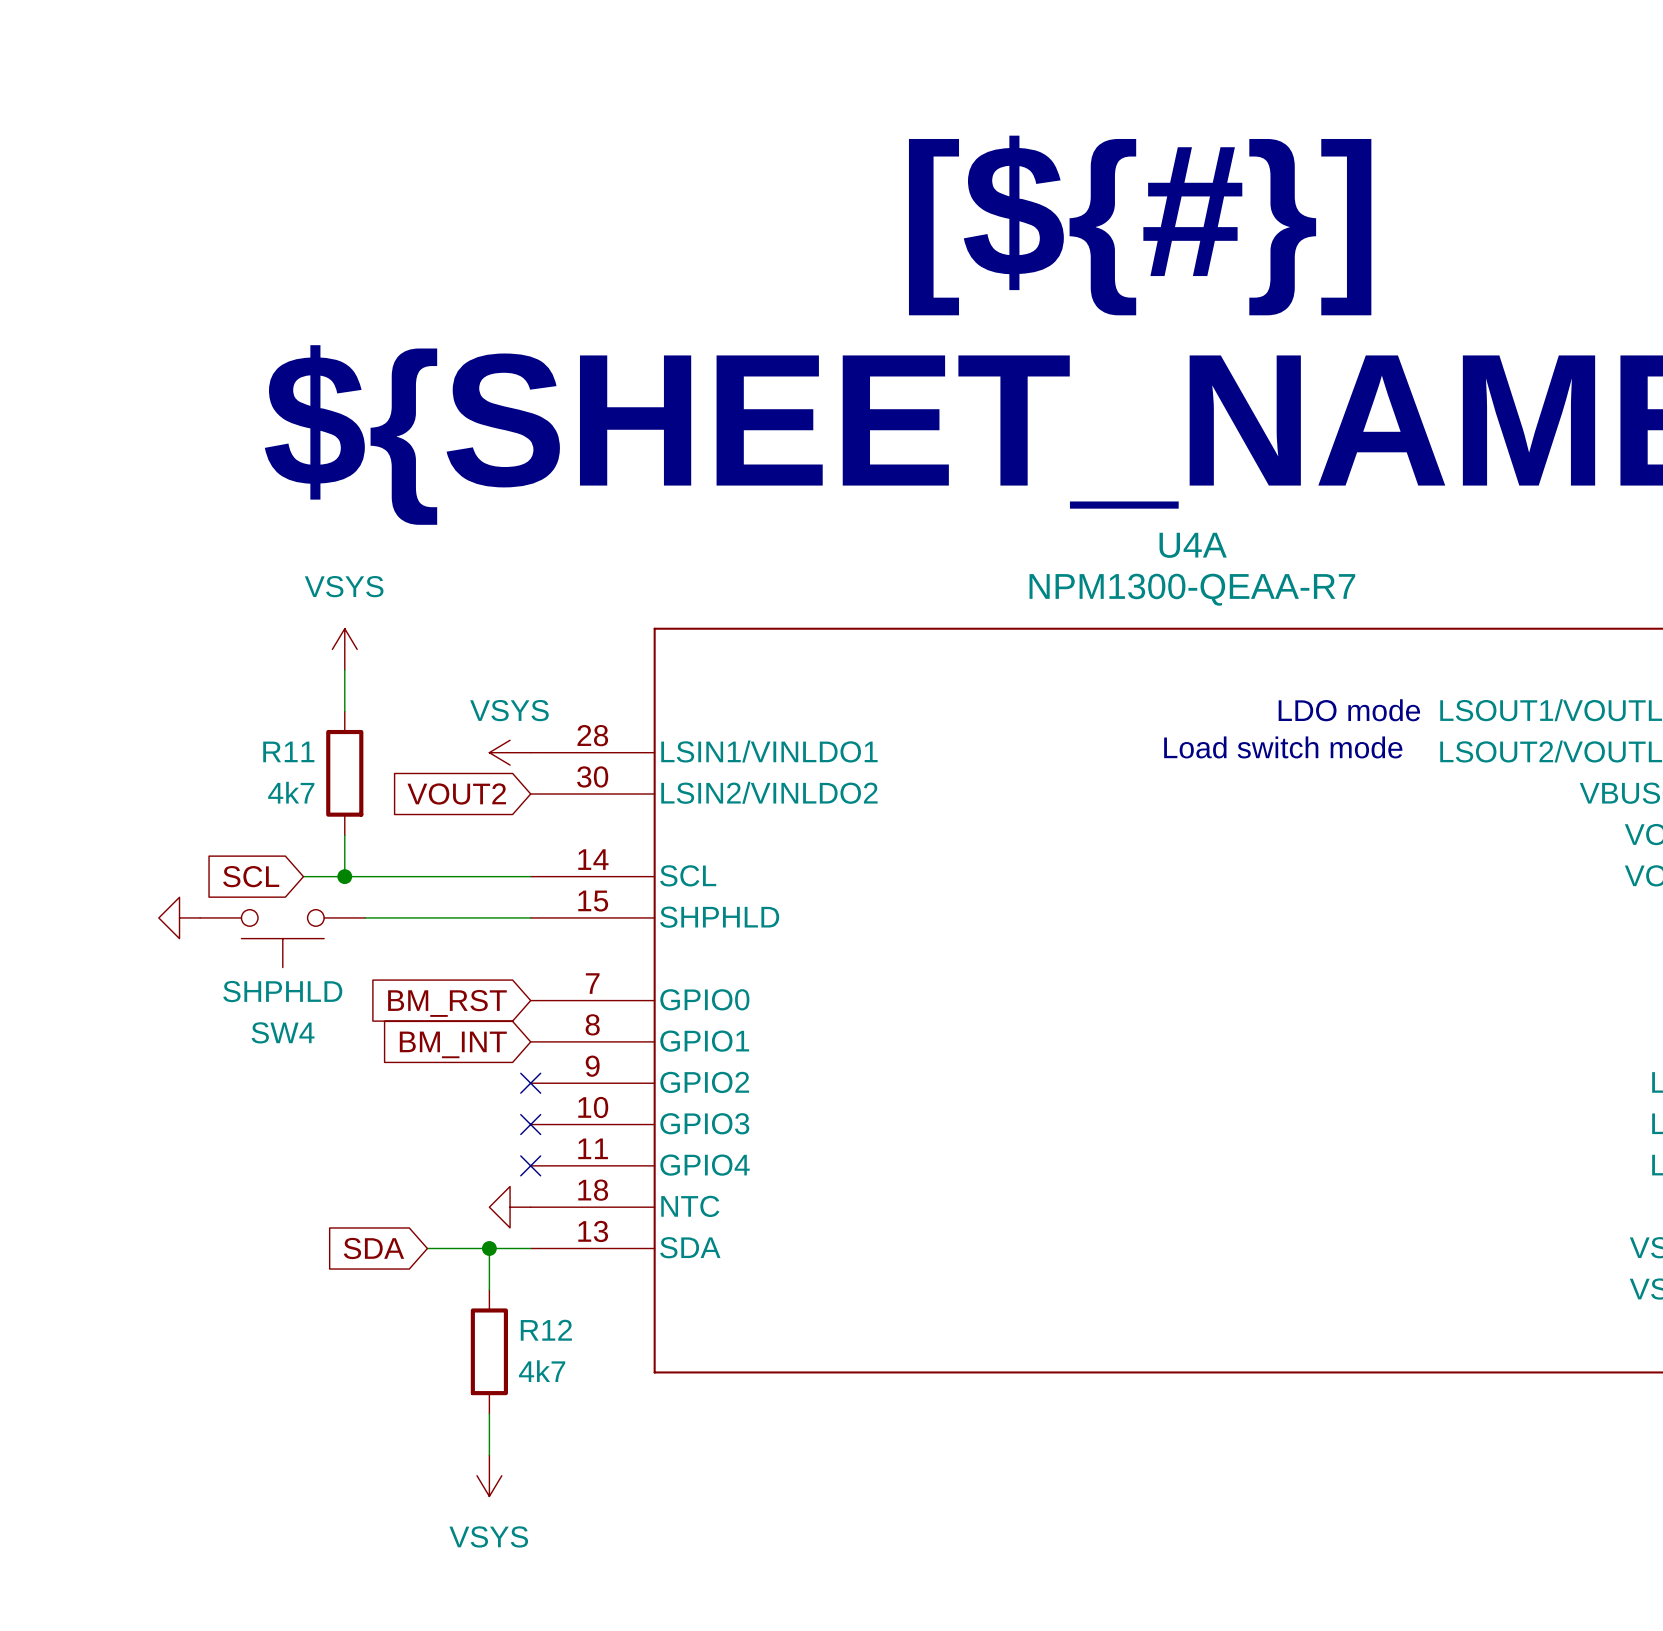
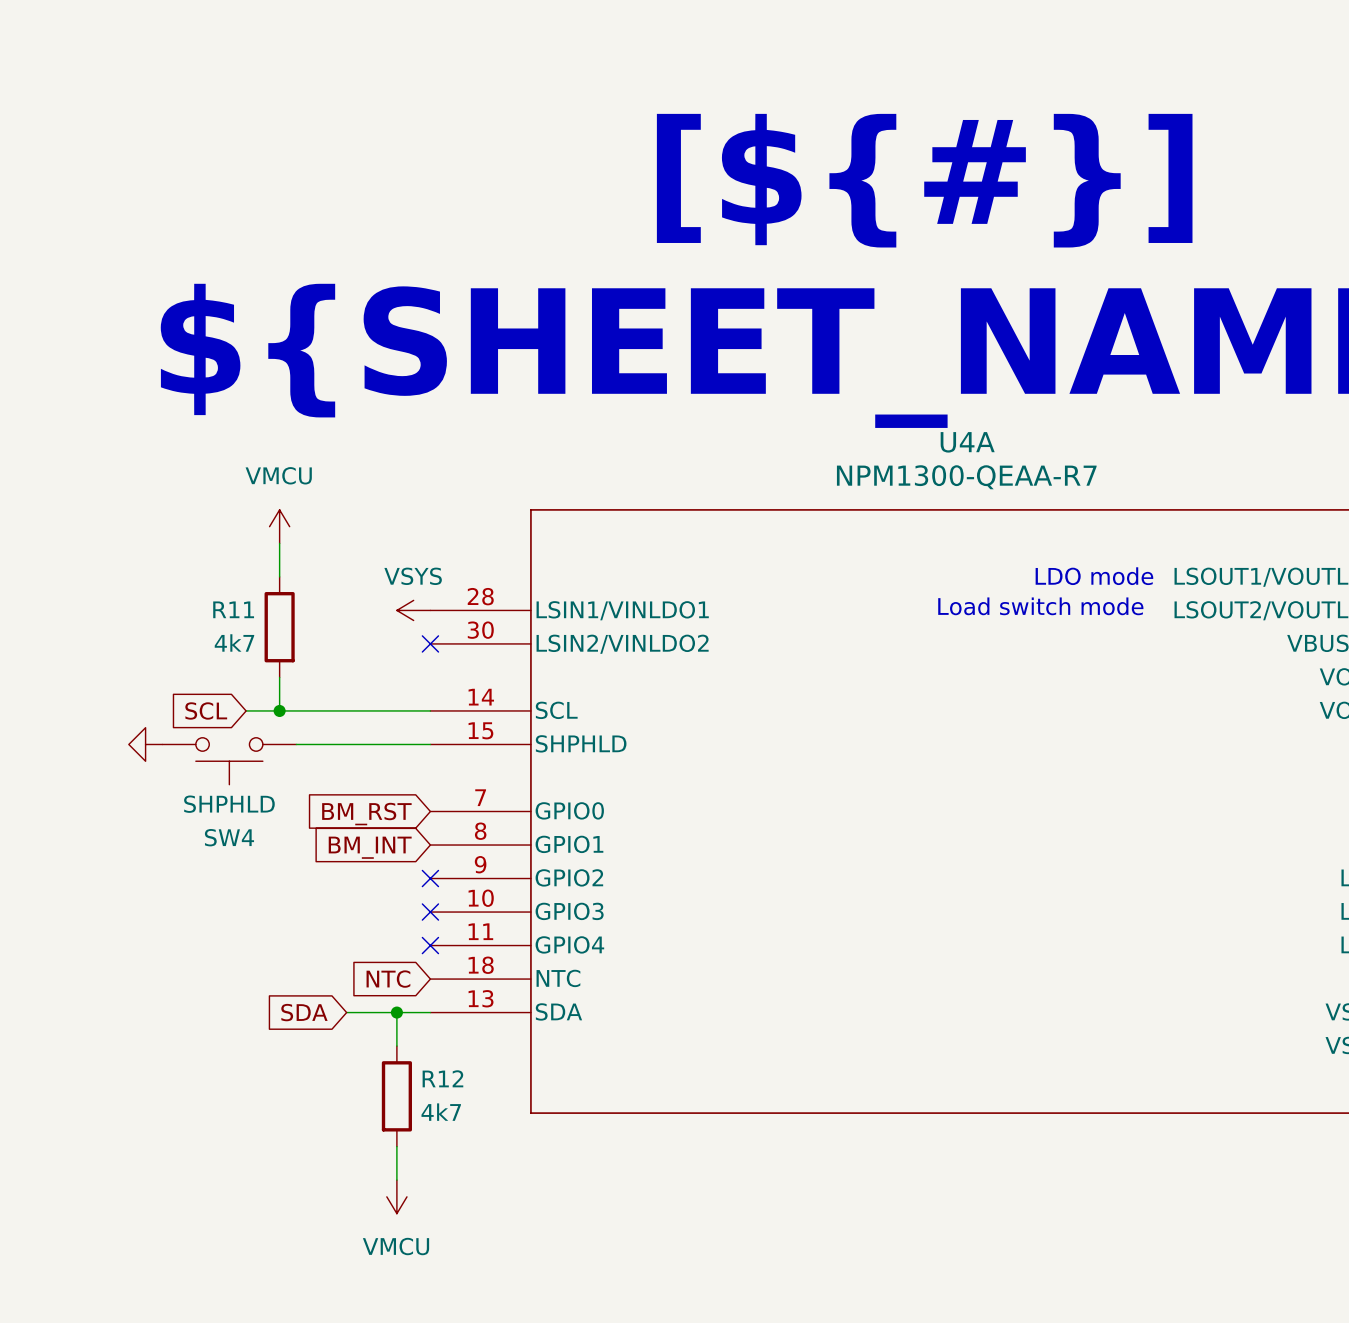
power symbol: VSYS (344, 649) -> VMCU (279, 526)
global label: VOUT2 (456, 793) -> none
no-connect mark: none -> (430, 643)
global label: none -> NTC (388, 979)
power symbol: (510, 1207) -> none
power symbol: VSYS (489, 1475) -> VMCU (396, 1196)

